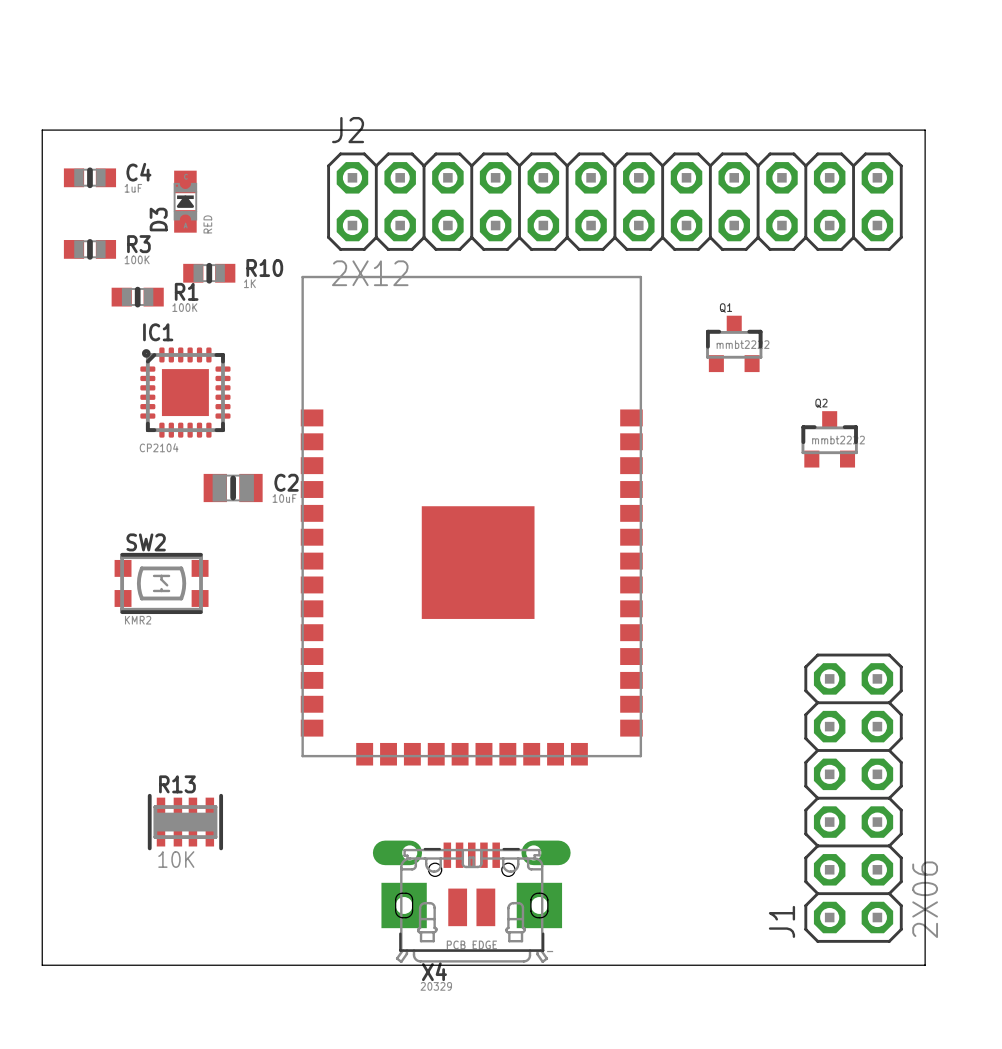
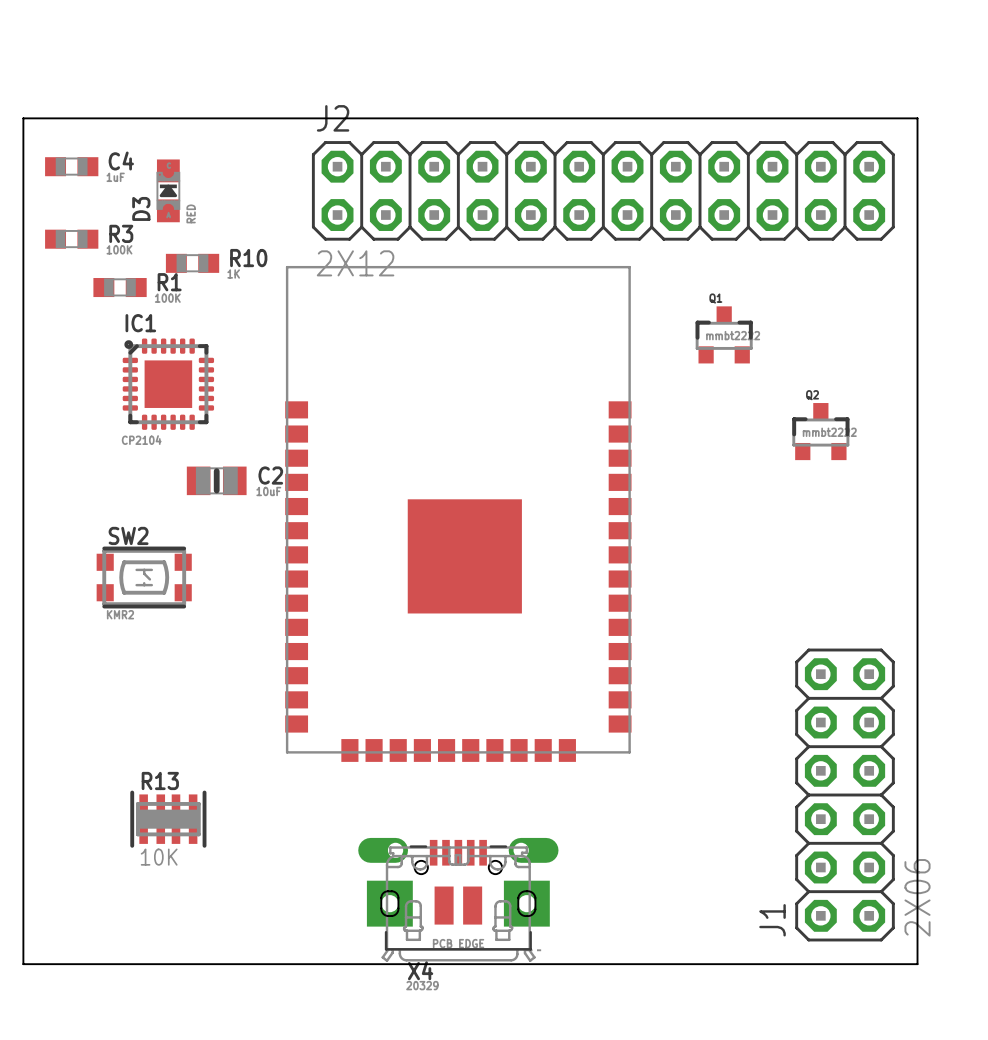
C4 footprint: [63, 167, 117, 189] -> [45, 157, 99, 177]
R3 footprint: [63, 239, 117, 260] -> [45, 229, 99, 249]
R10 footprint: [183, 262, 236, 284] -> [165, 253, 220, 273]
R1 footprint: [111, 286, 164, 308] -> [93, 278, 147, 298]

